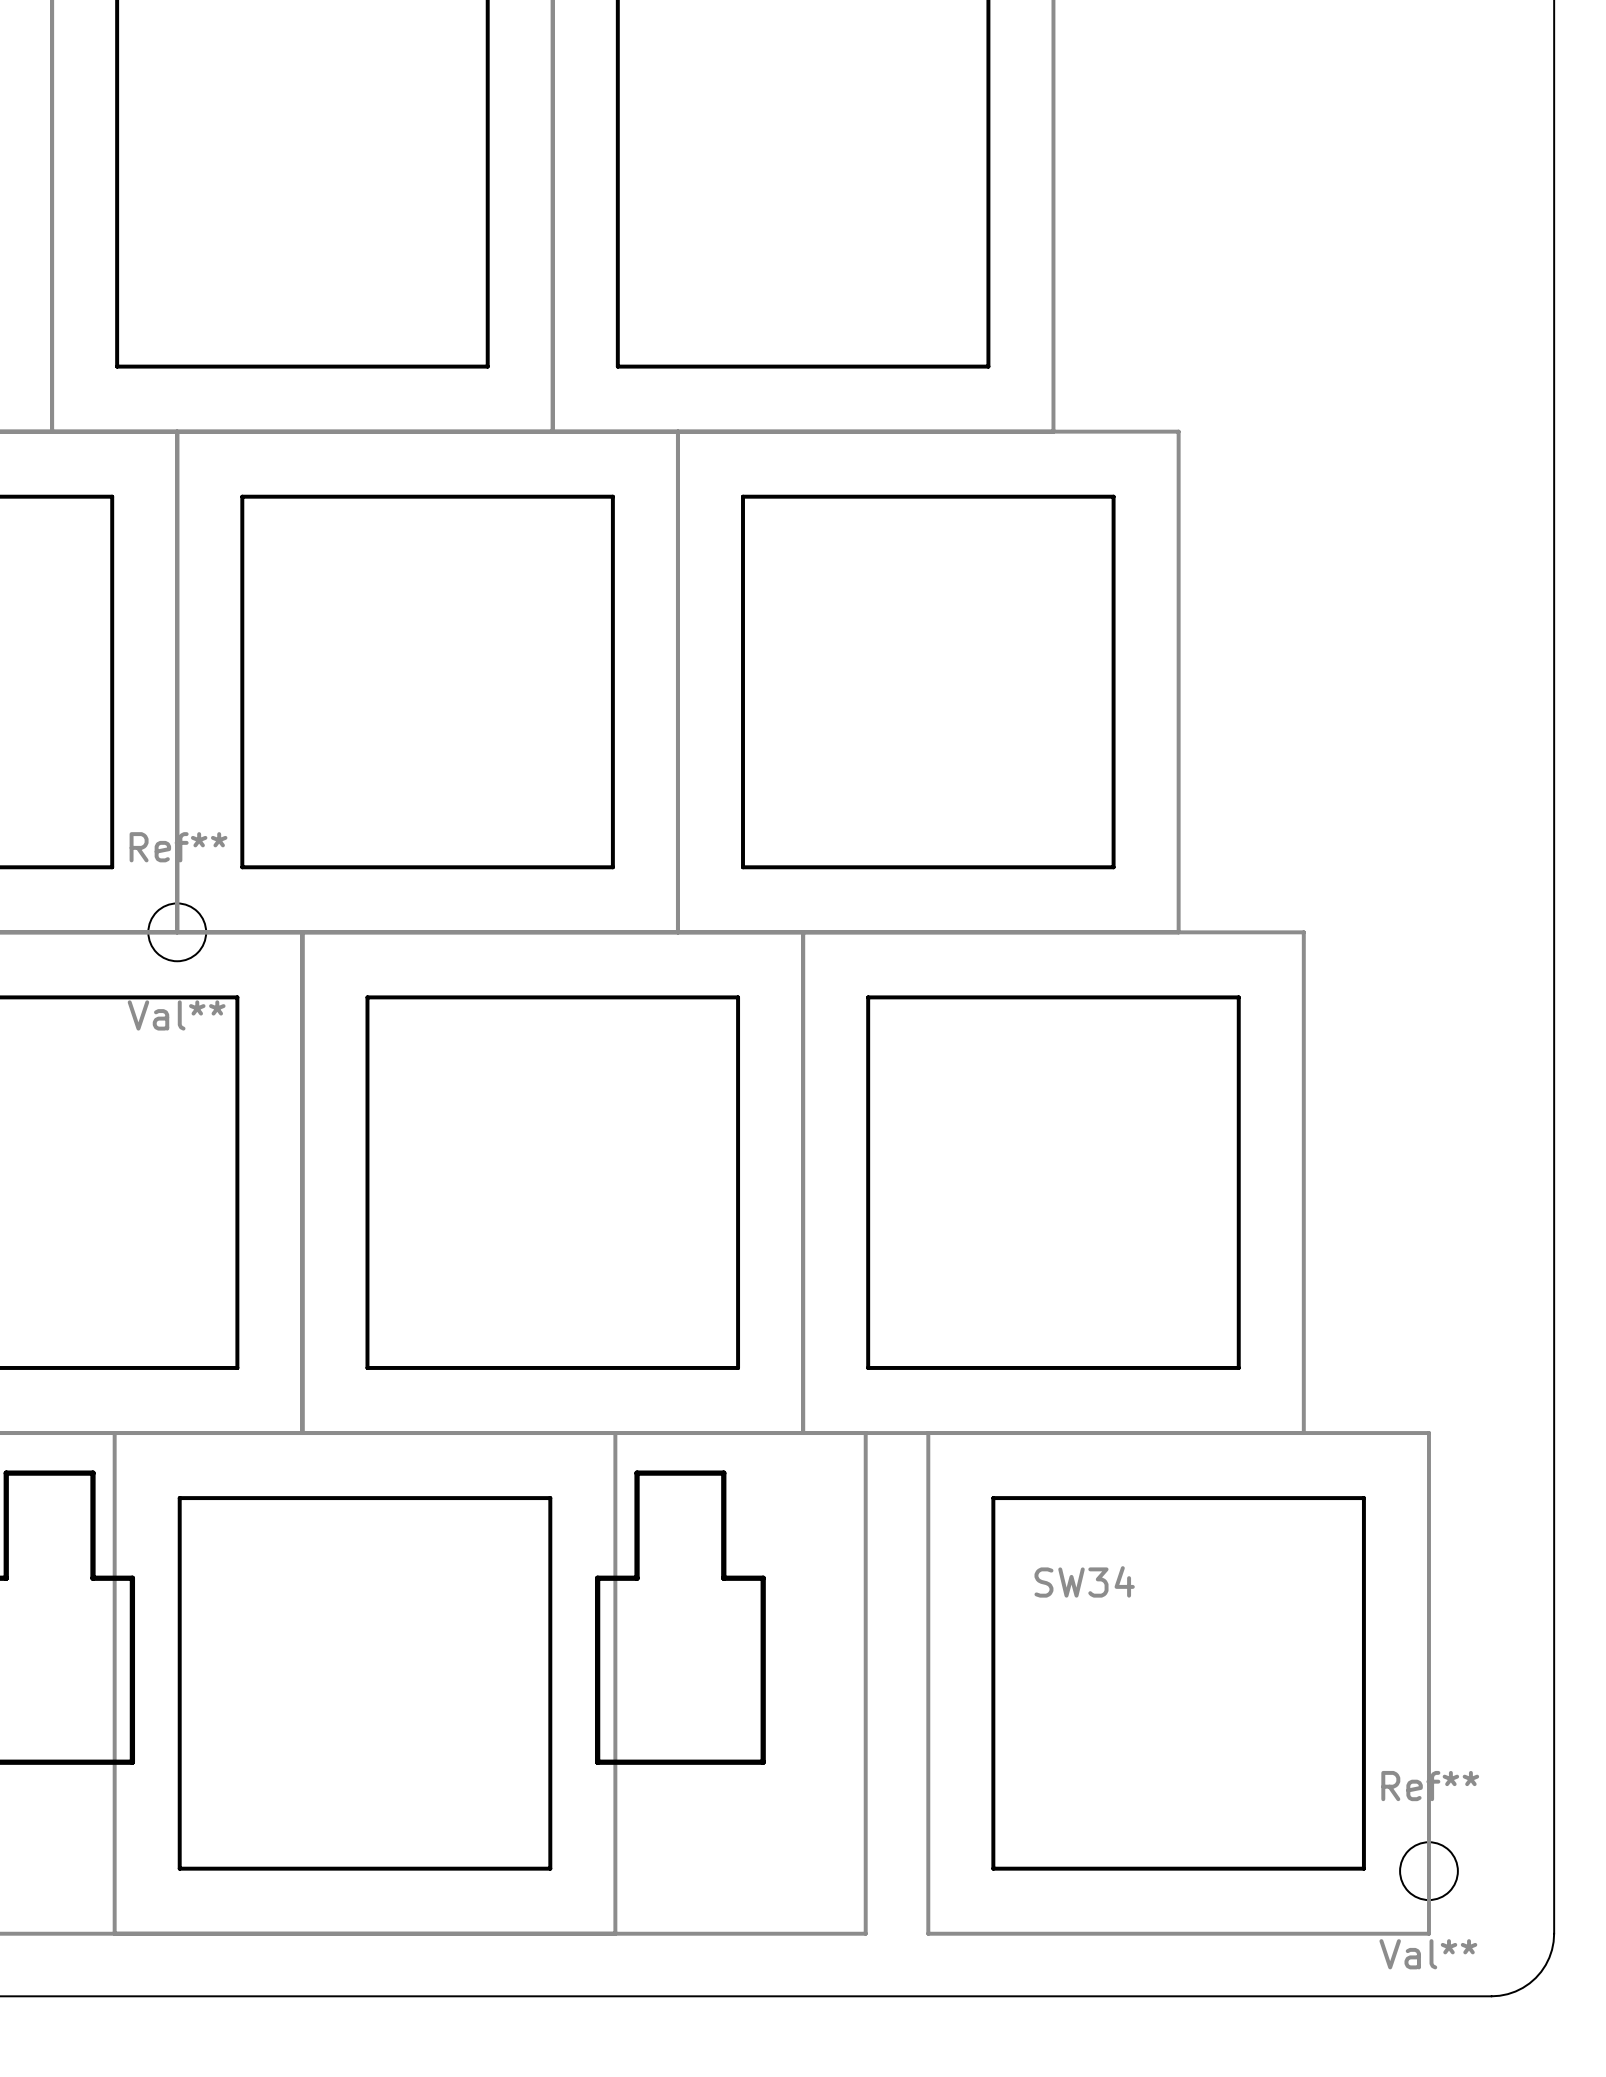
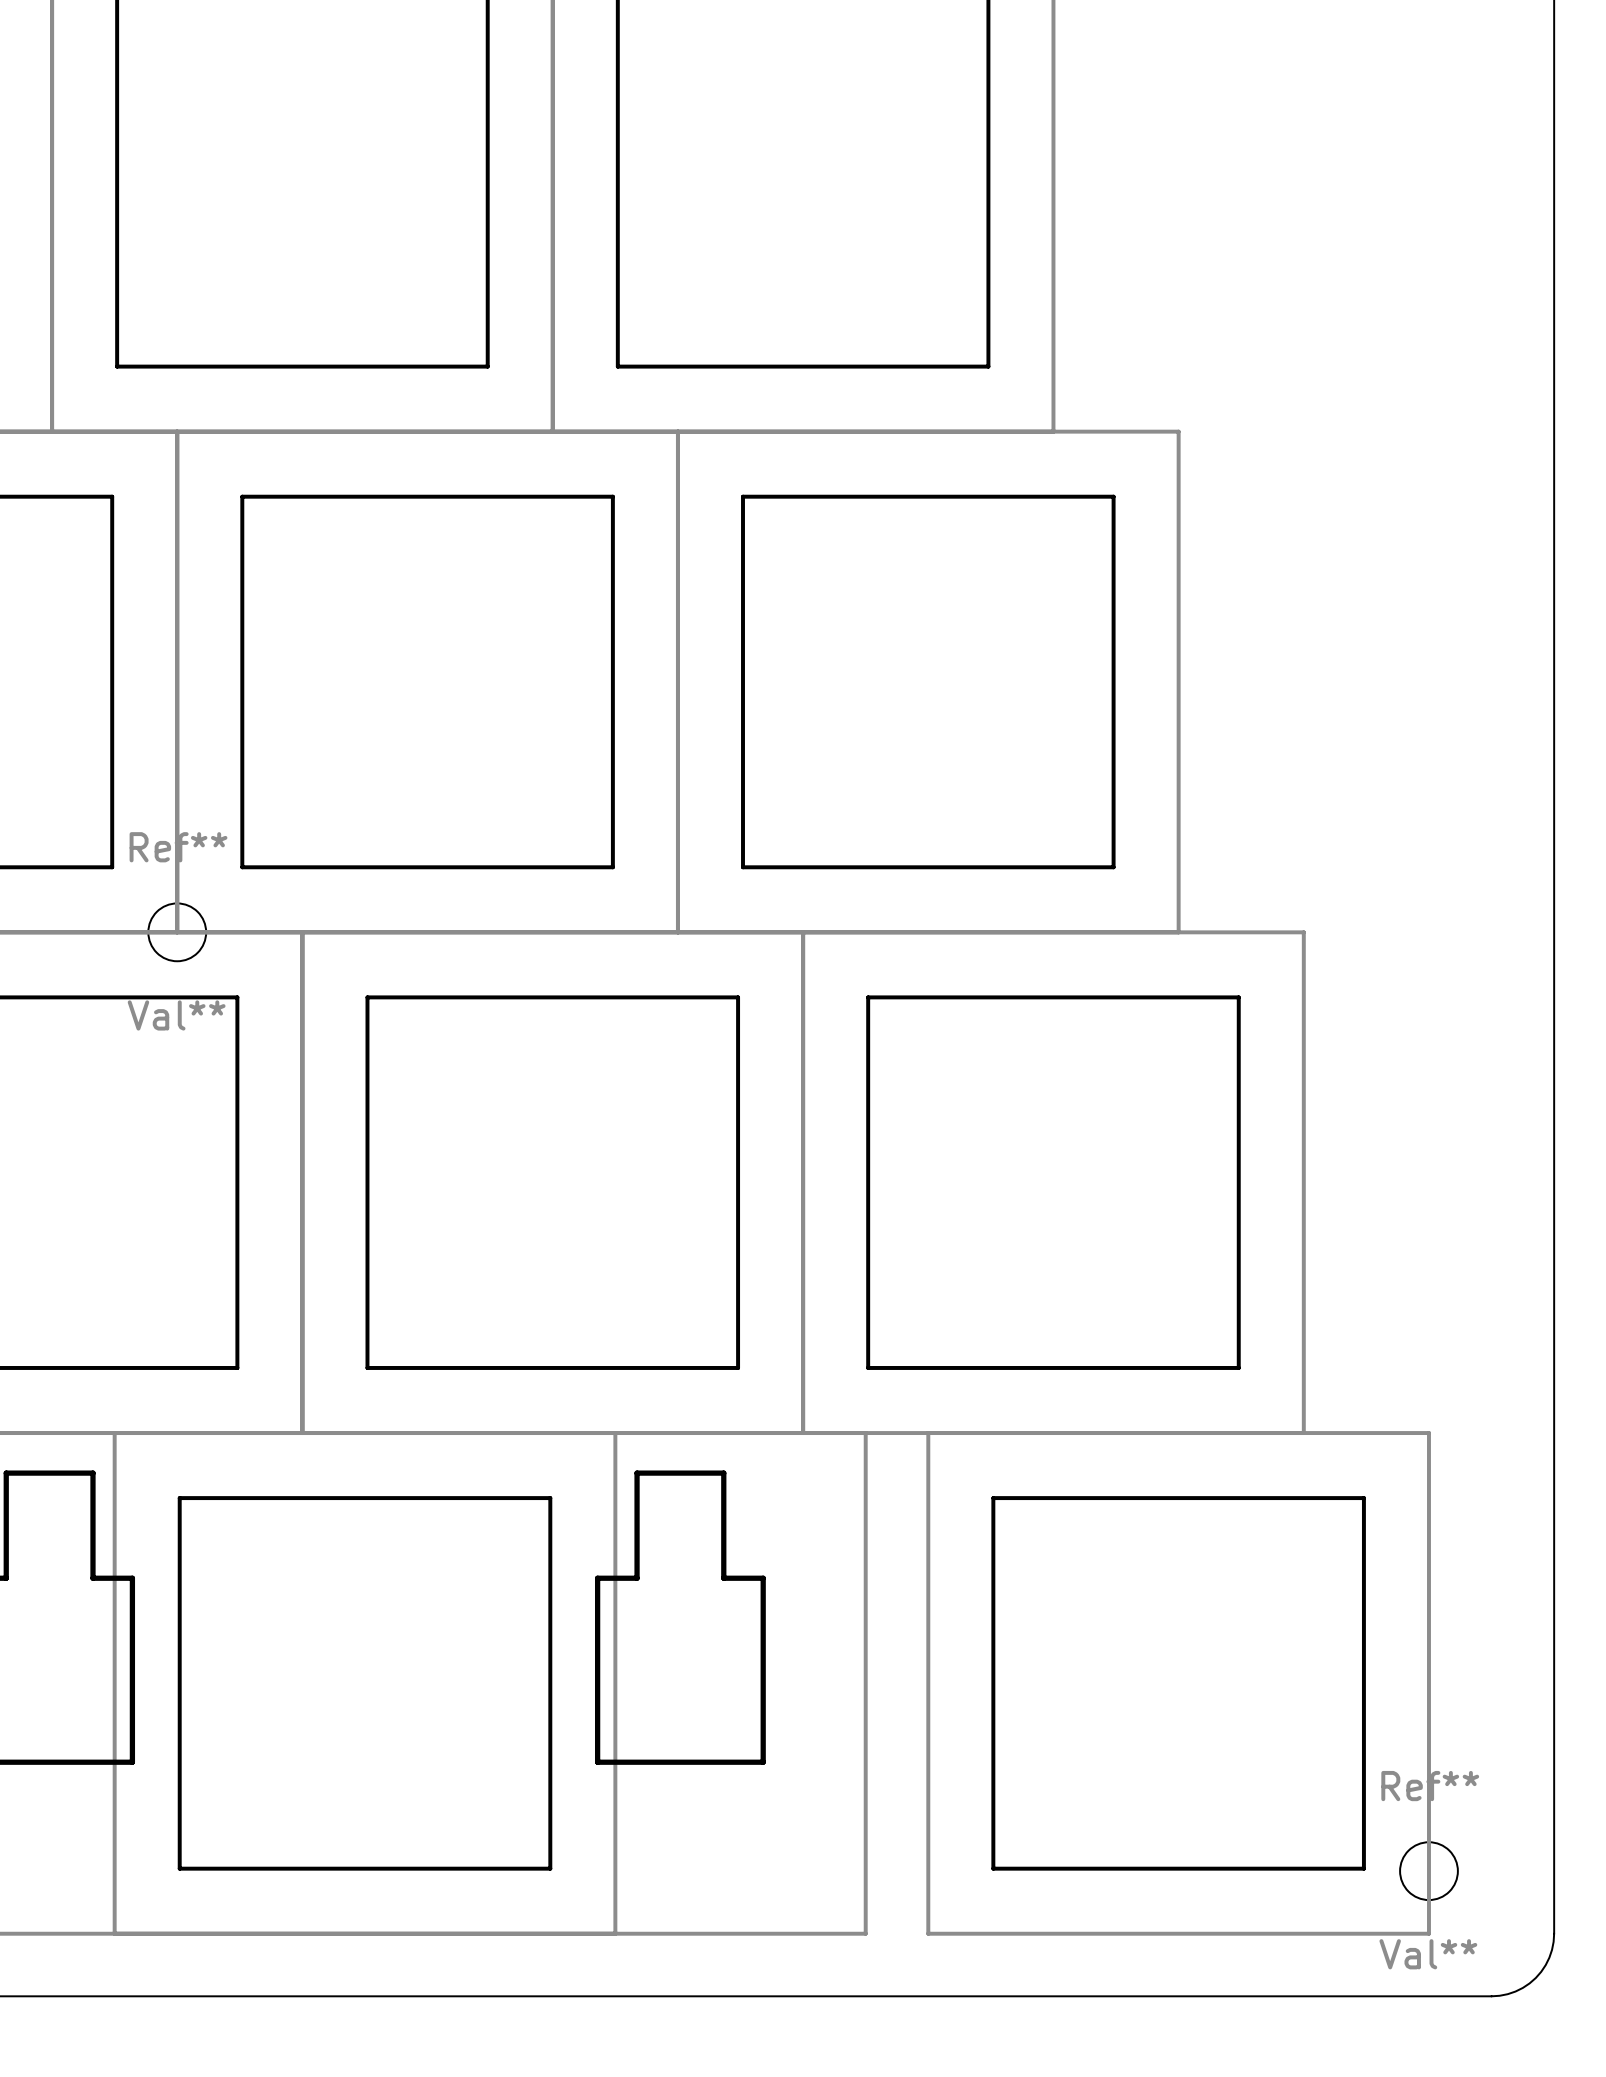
SW34: (1178, 1683) -> none

